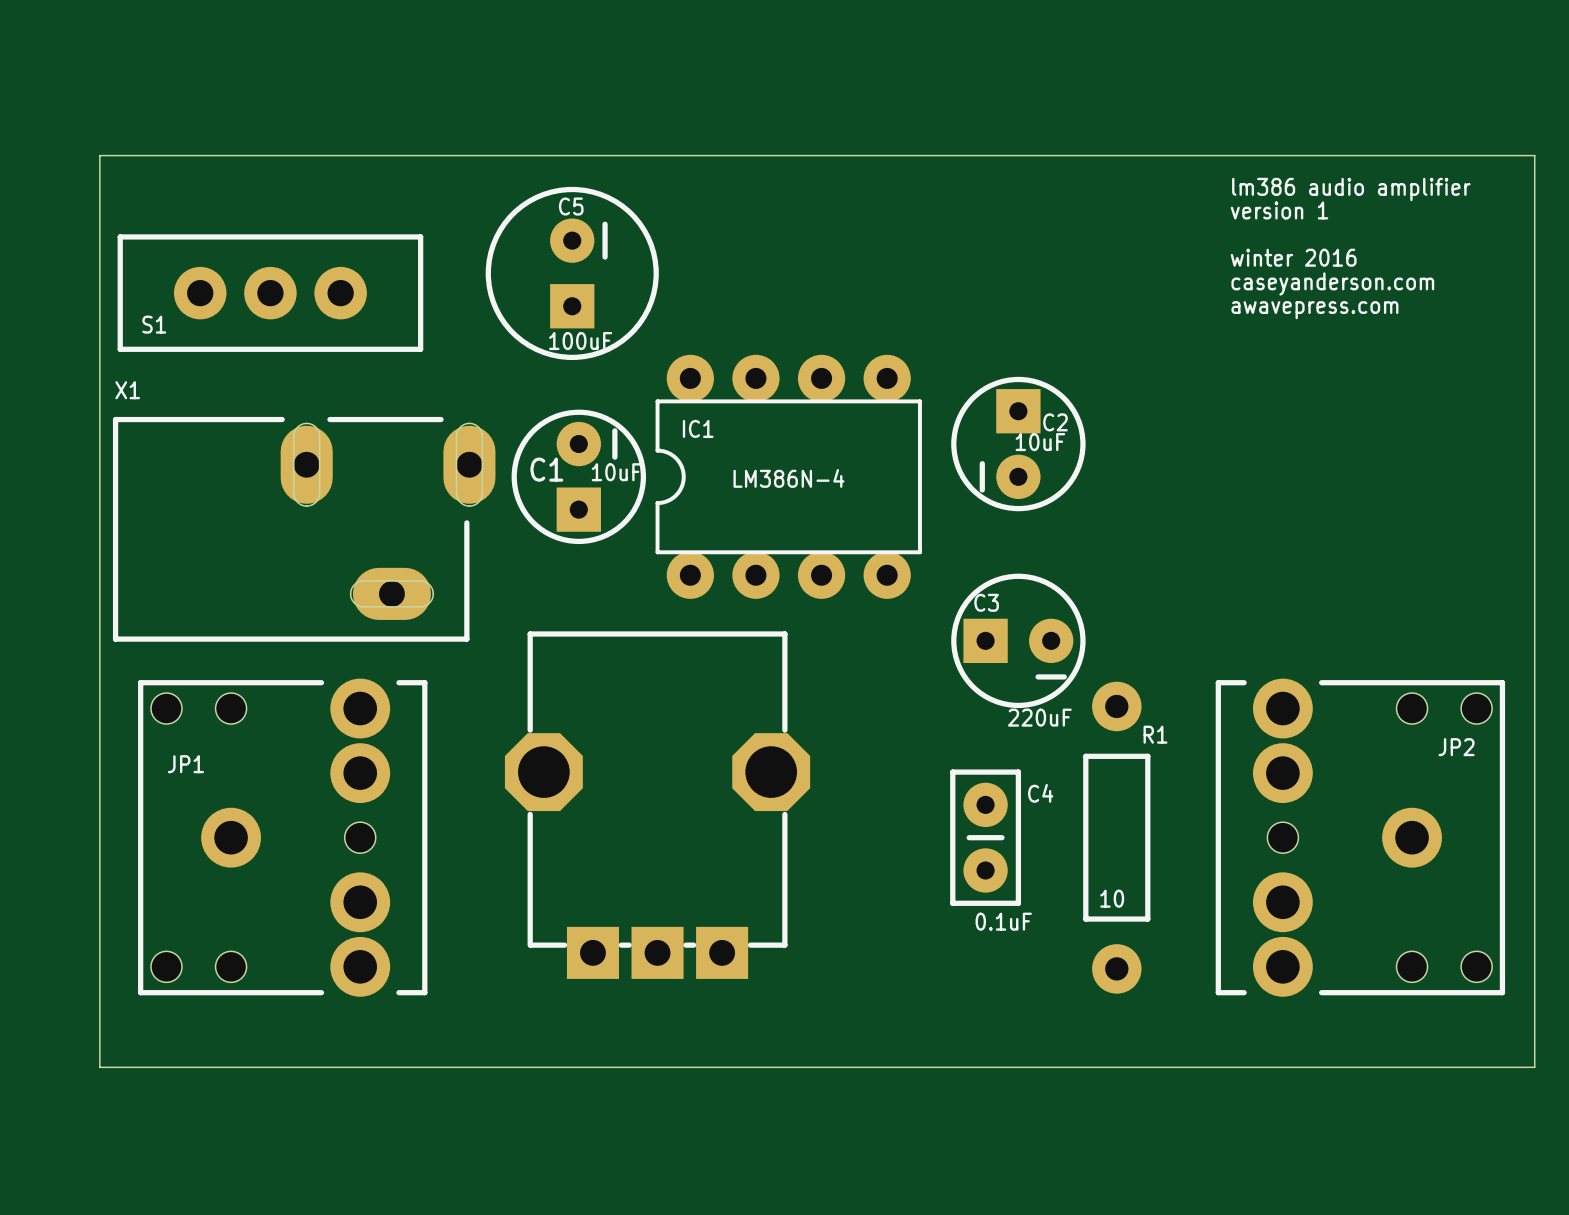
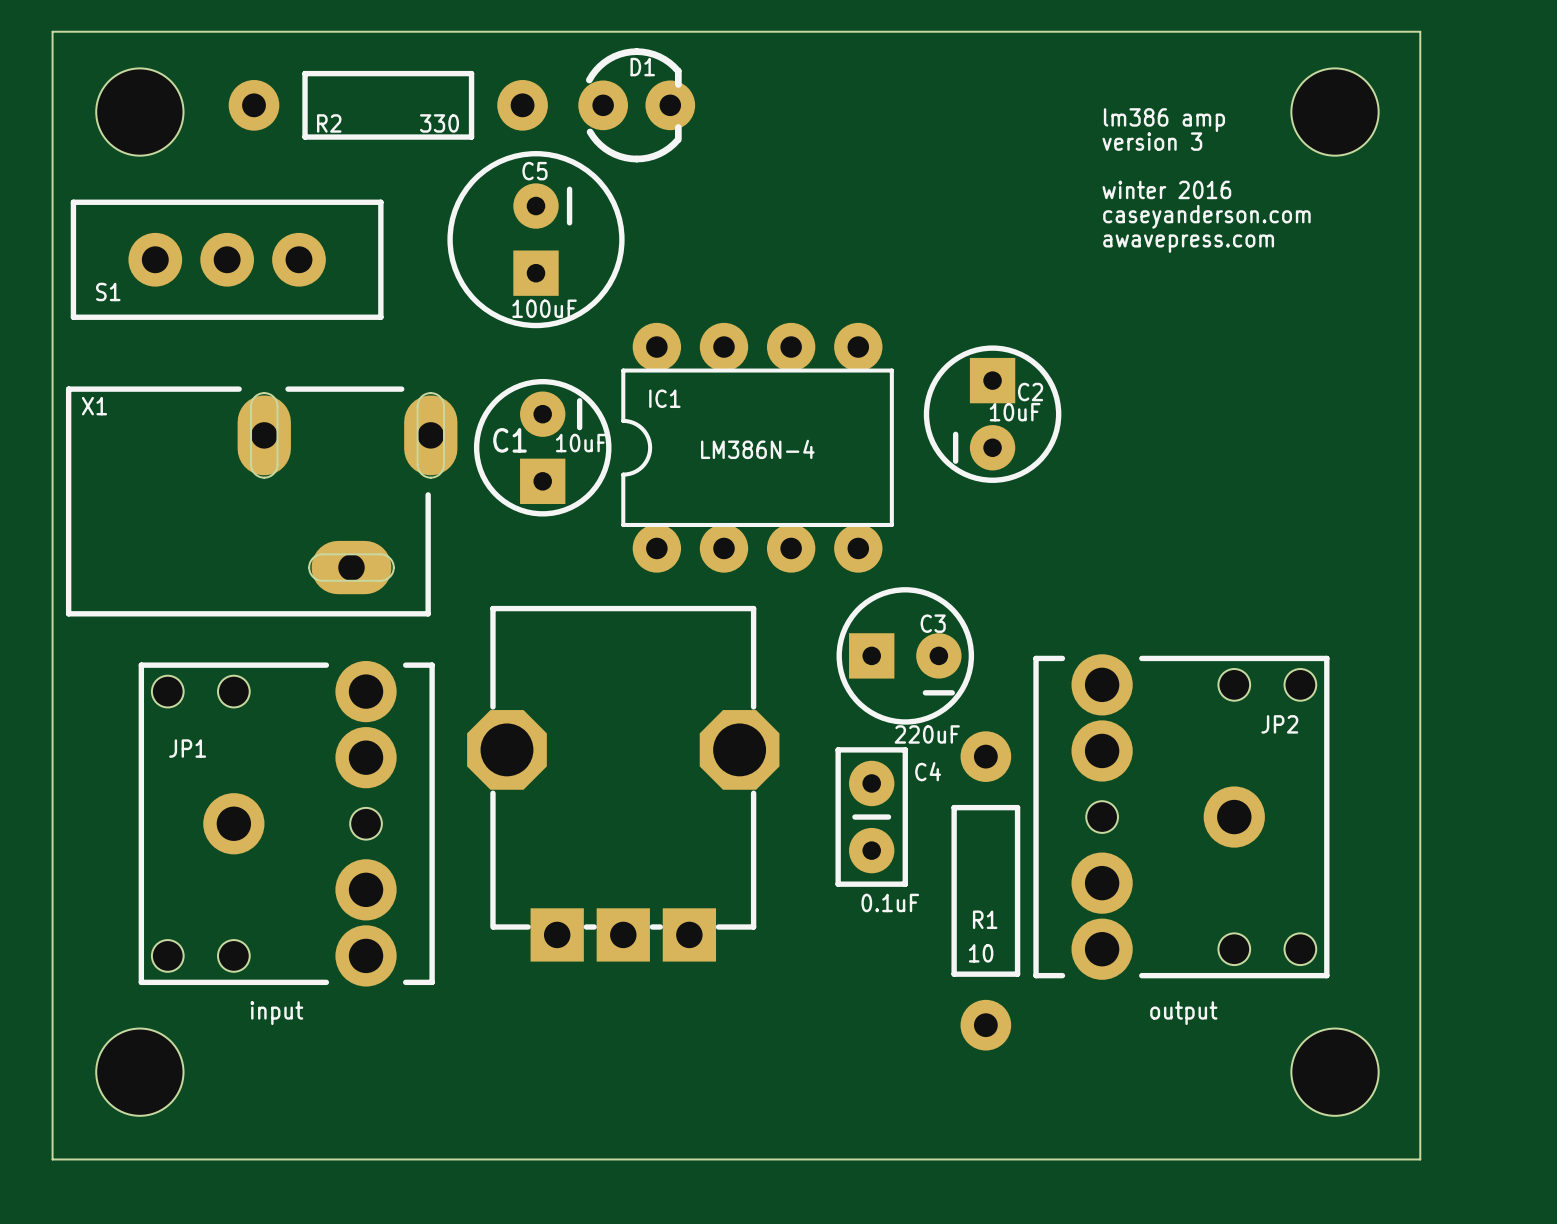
R2: none -> 330 (388, 105)
D1: none -> (636, 105)
part: none -> (139, 112)
part: none -> (1335, 112)
board edge: (99, 155) (1534, 155) (1534, 1067) (99, 1067) -> (52, 119) (52, 31) (1420, 31) (1420, 1159) (52, 1159) (52, 1052)
text: none -> lm386 amp (1164, 120)
text: lm386 audio amplifier (1351, 189) -> none
text: version 1 (1279, 210) -> version 3 (1152, 141)
text position: winter 2016 (1293, 257) -> winter 2016 (1166, 189)
text position: caseyanderson.com (1332, 283) -> caseyanderson.com (1206, 216)
text position: awavepress.com (1314, 310) -> awavepress.com (1188, 243)
X1 name position: X1 (127, 390) -> X1 (94, 406)
C3 name position: C3 (986, 602) -> C3 (933, 623)
C3 position: (1018, 640) -> (905, 655)
R1 name position: R1 (1155, 734) -> R1 (985, 919)
JP1 position: (282, 837) -> (286, 823)
C4 position: (985, 837) -> (871, 817)
R1 position: (1116, 837) -> (985, 890)
JP2 position: (1360, 837) -> (1181, 817)
text: none -> input (276, 1013)
text: none -> output (1183, 1013)
part: none -> (139, 1072)
part: none -> (1335, 1072)

